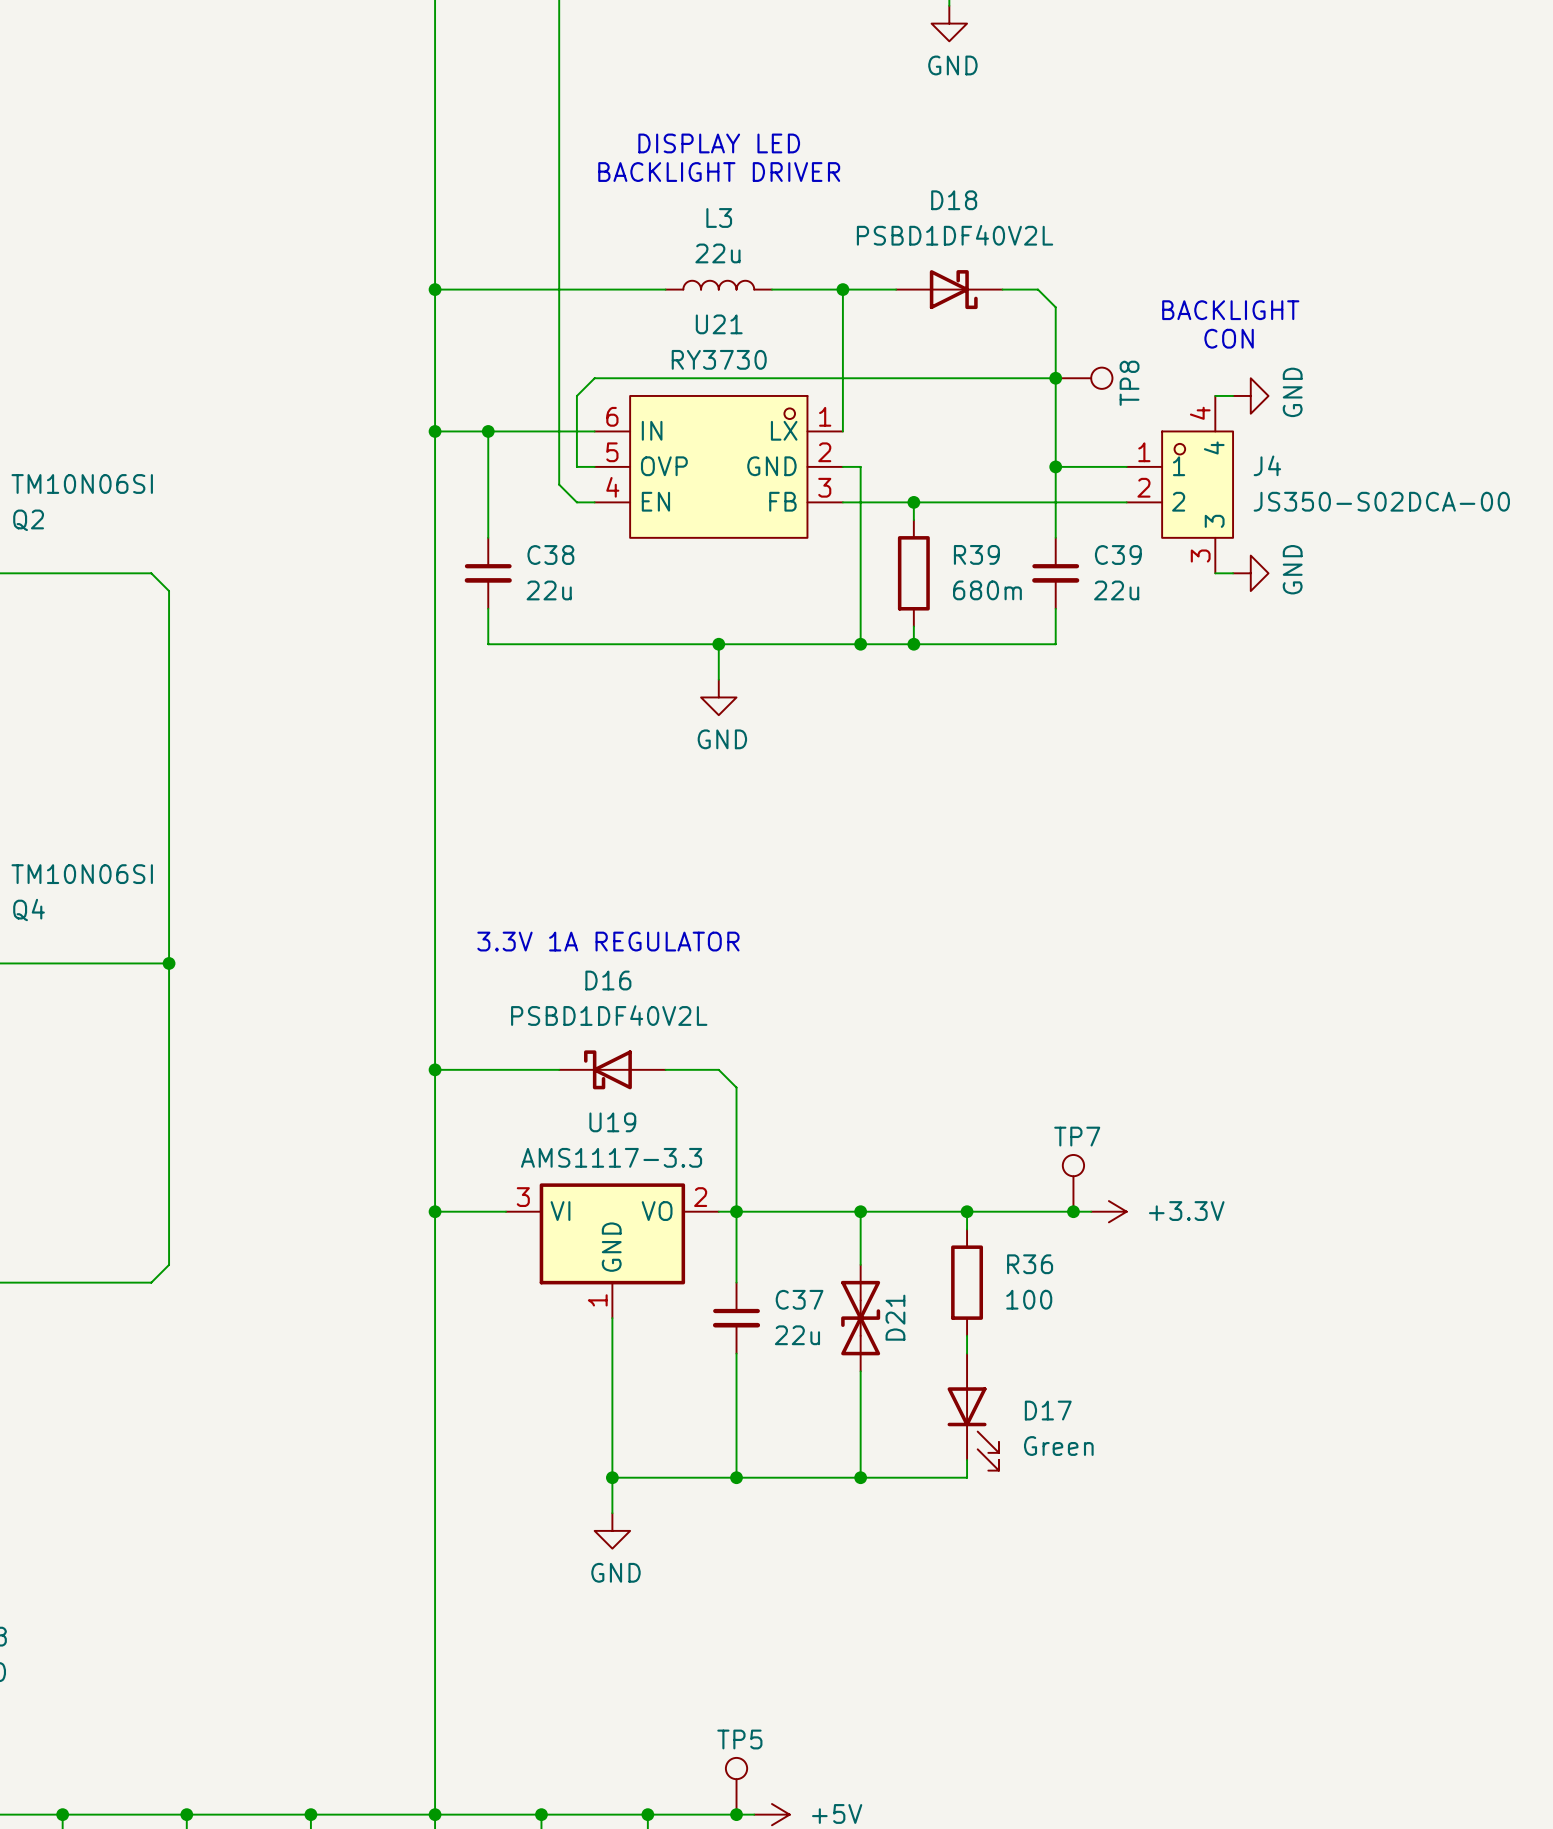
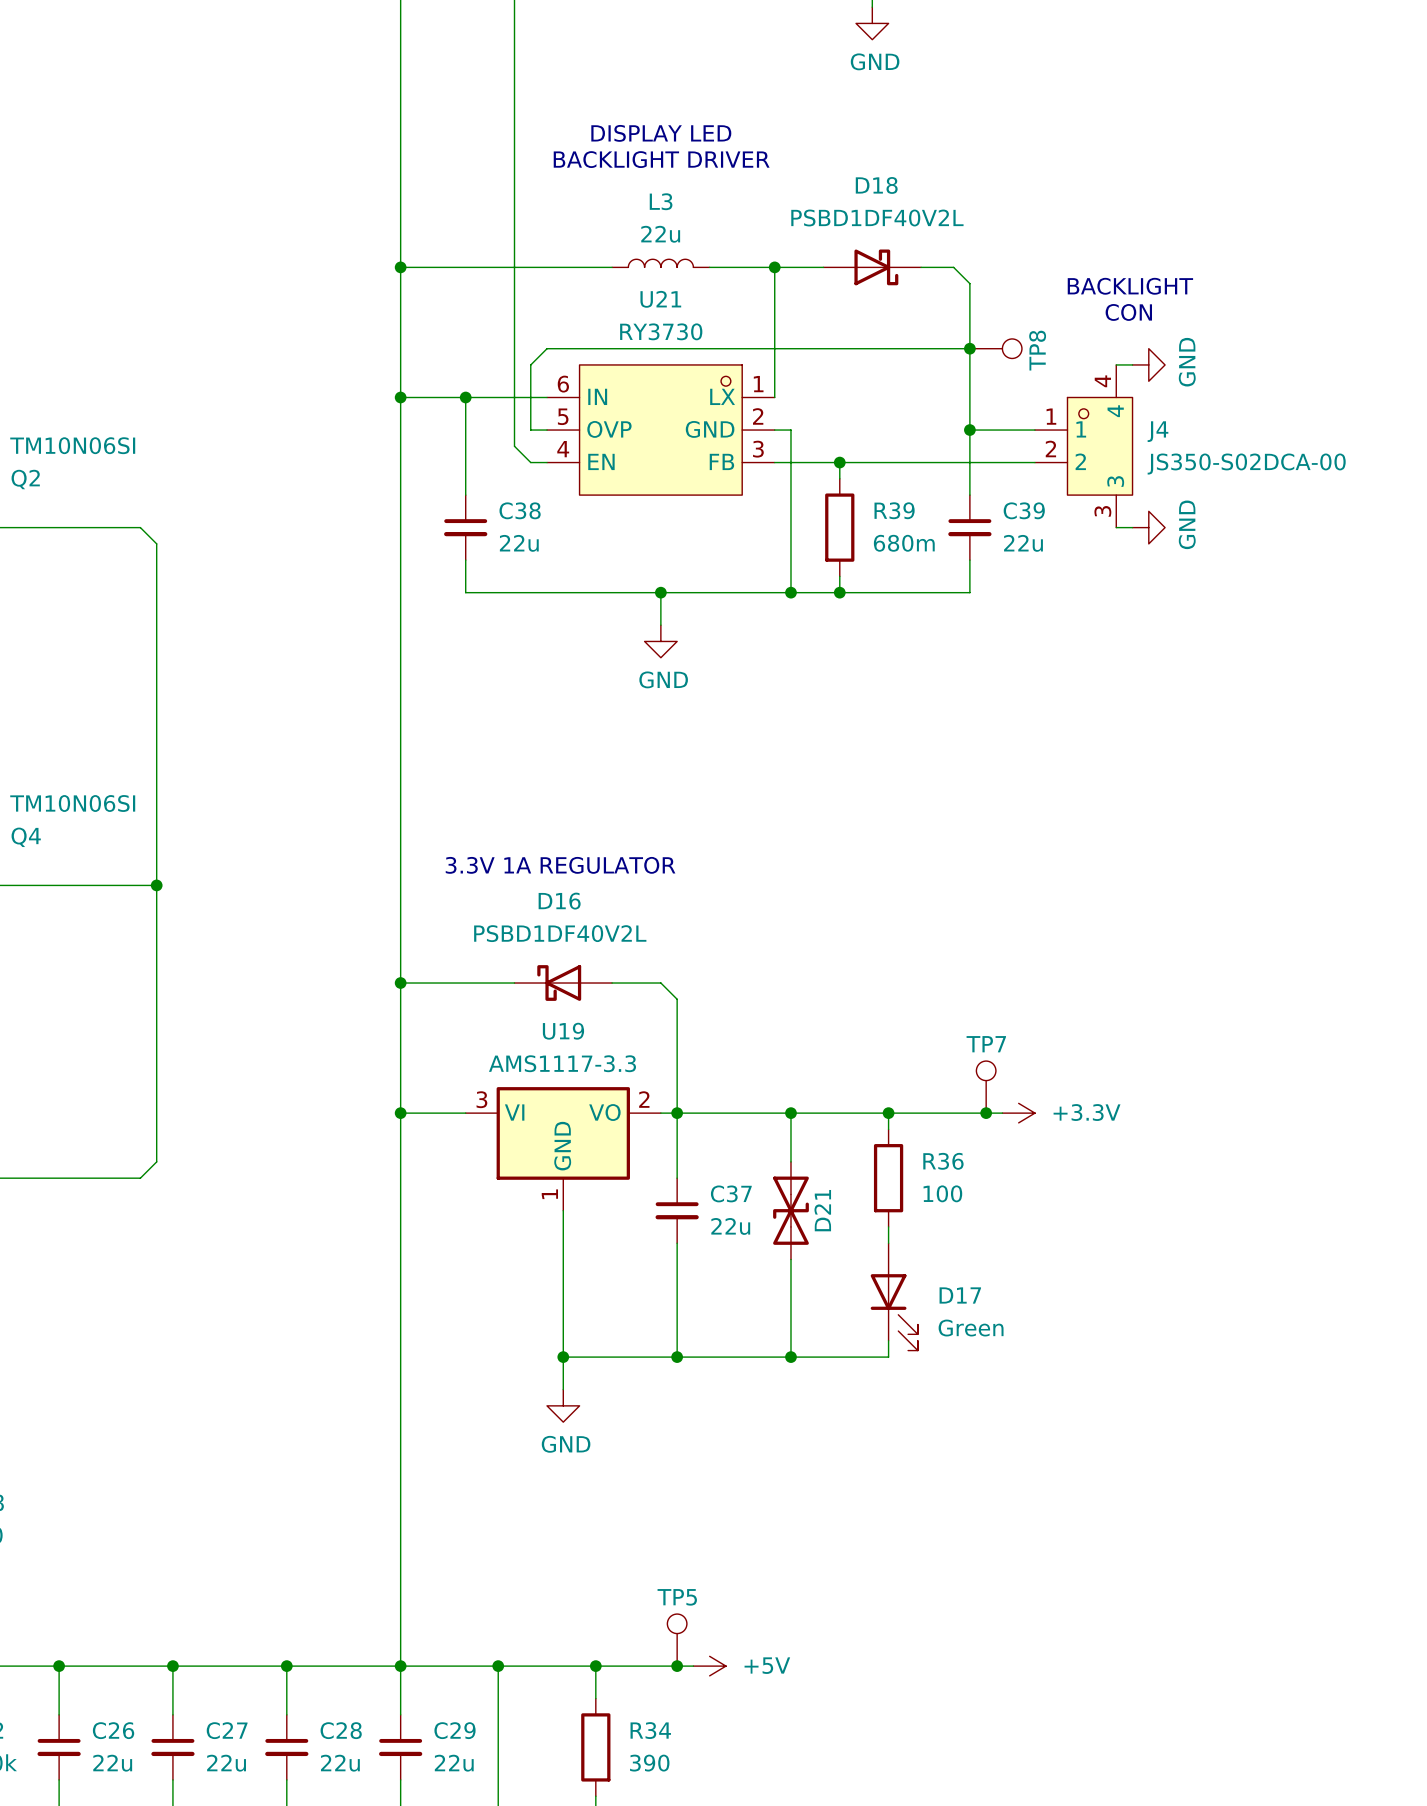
wire: (488, 431) (488, 537) -> (465, 397) (465, 495)
junction position: (488, 431) -> (465, 397)
C38 position: (488, 573) -> (465, 527)
wire: (488, 608) (488, 644) (505, 644) -> (465, 560) (465, 592)

